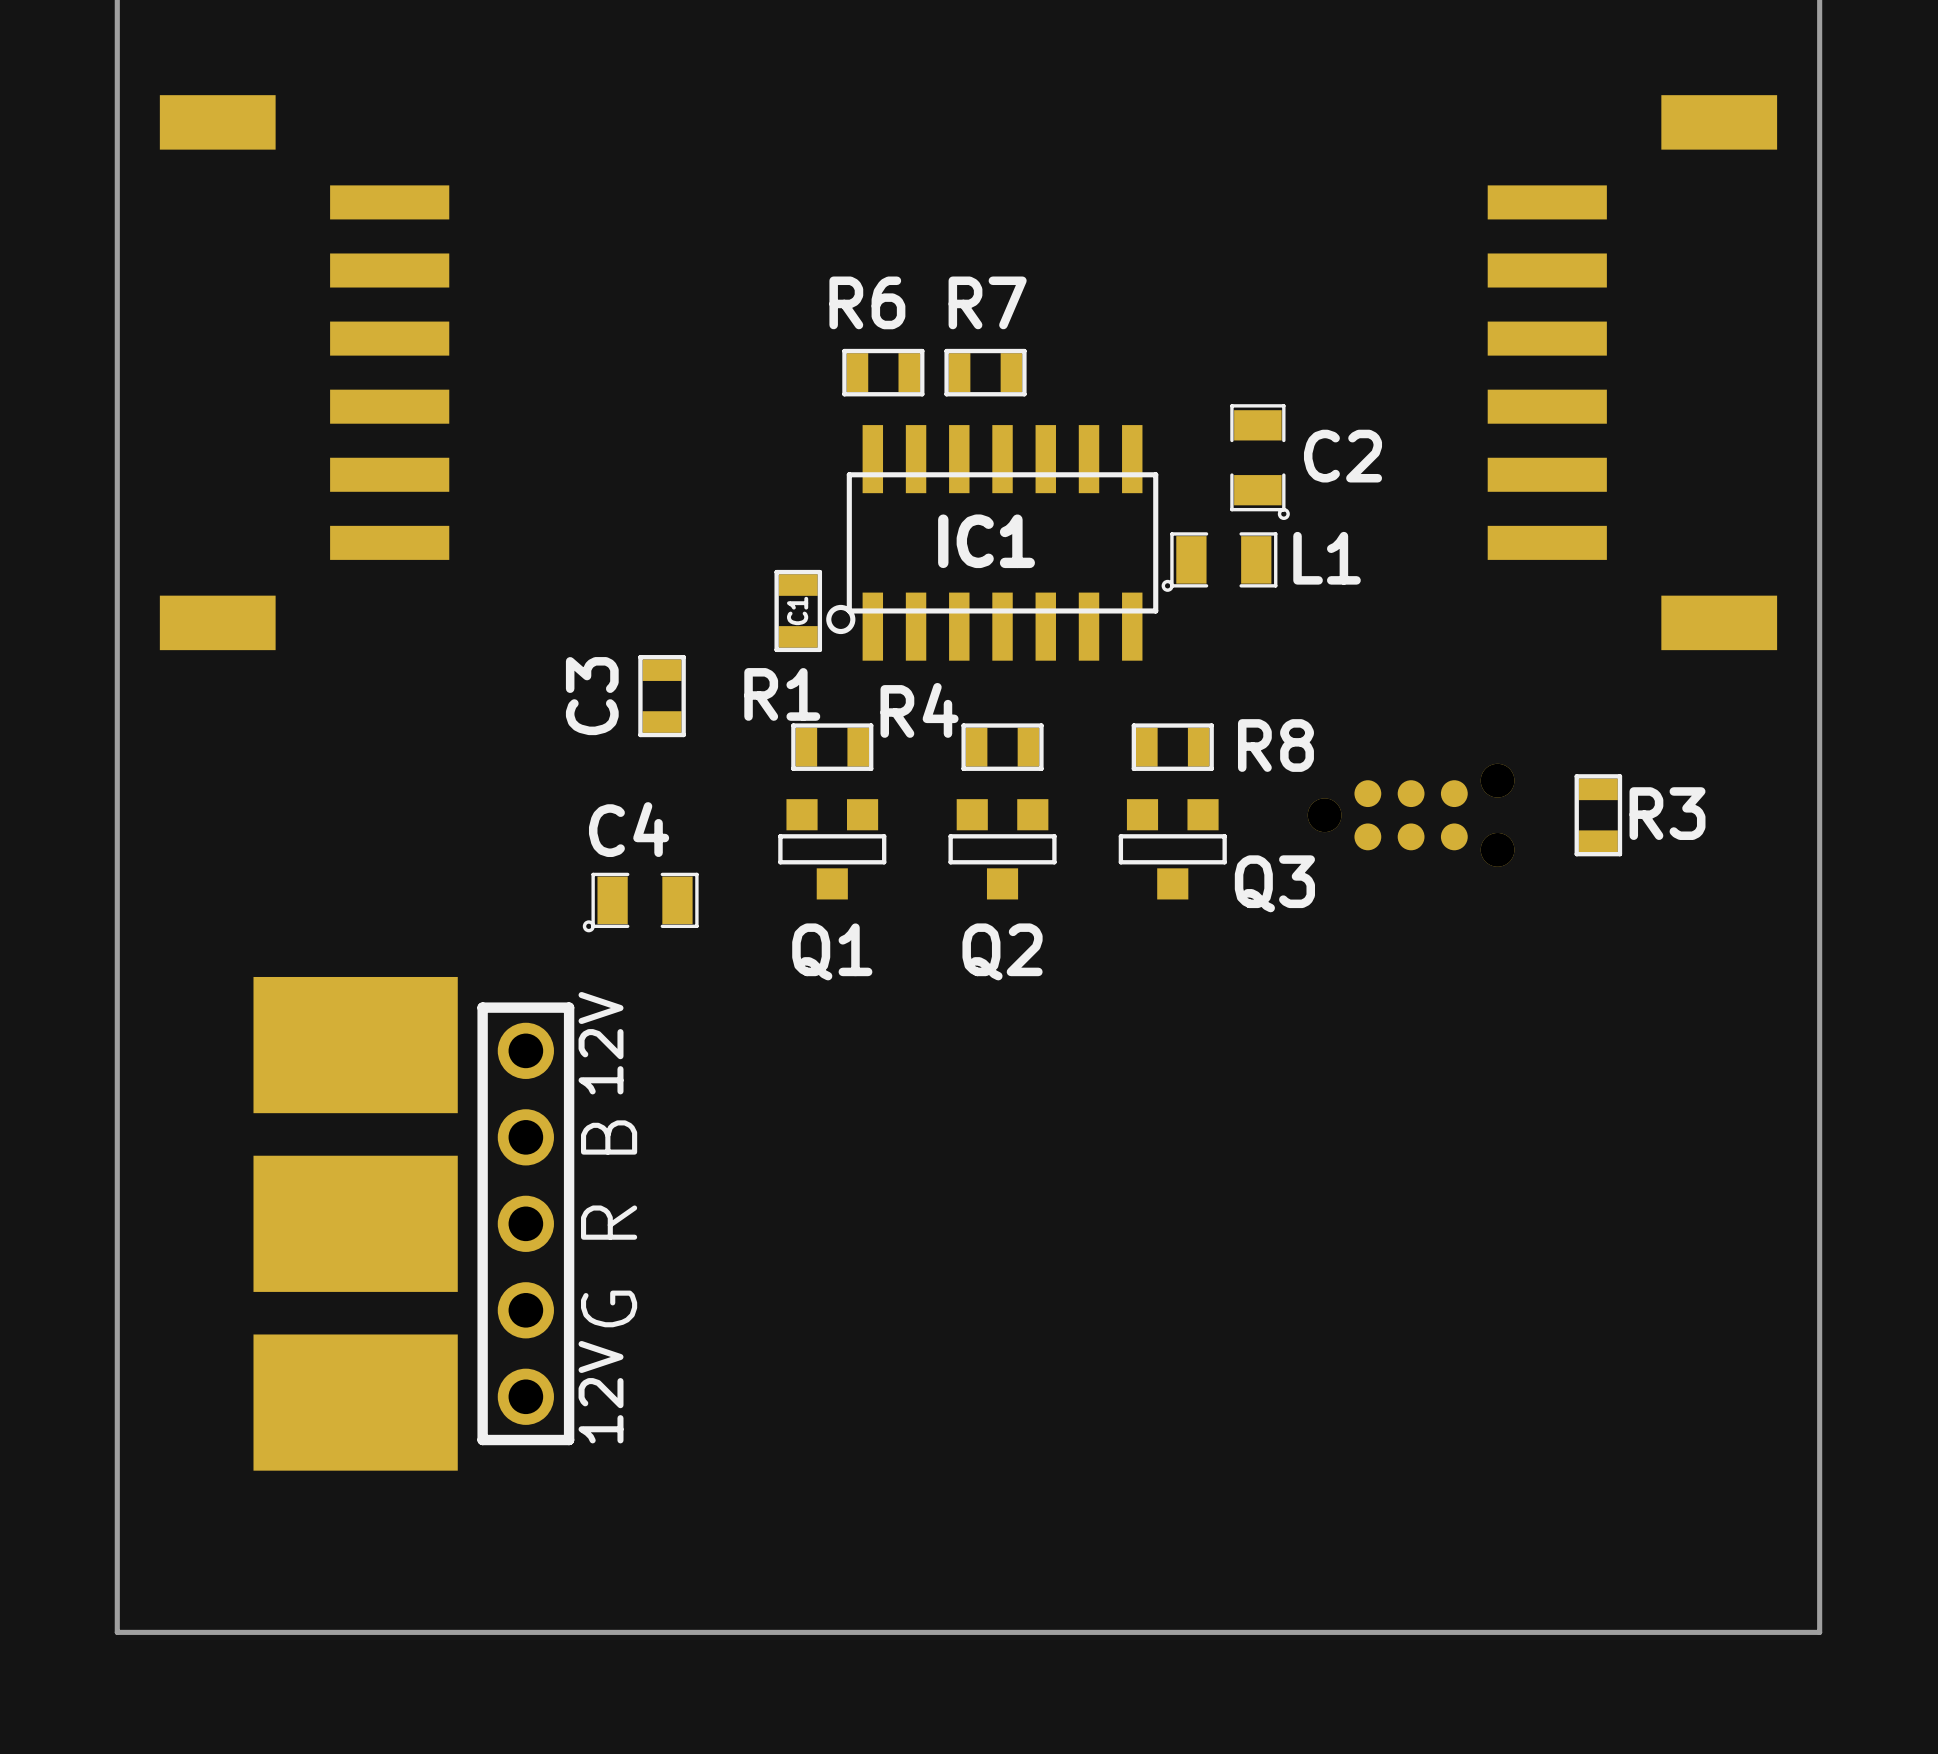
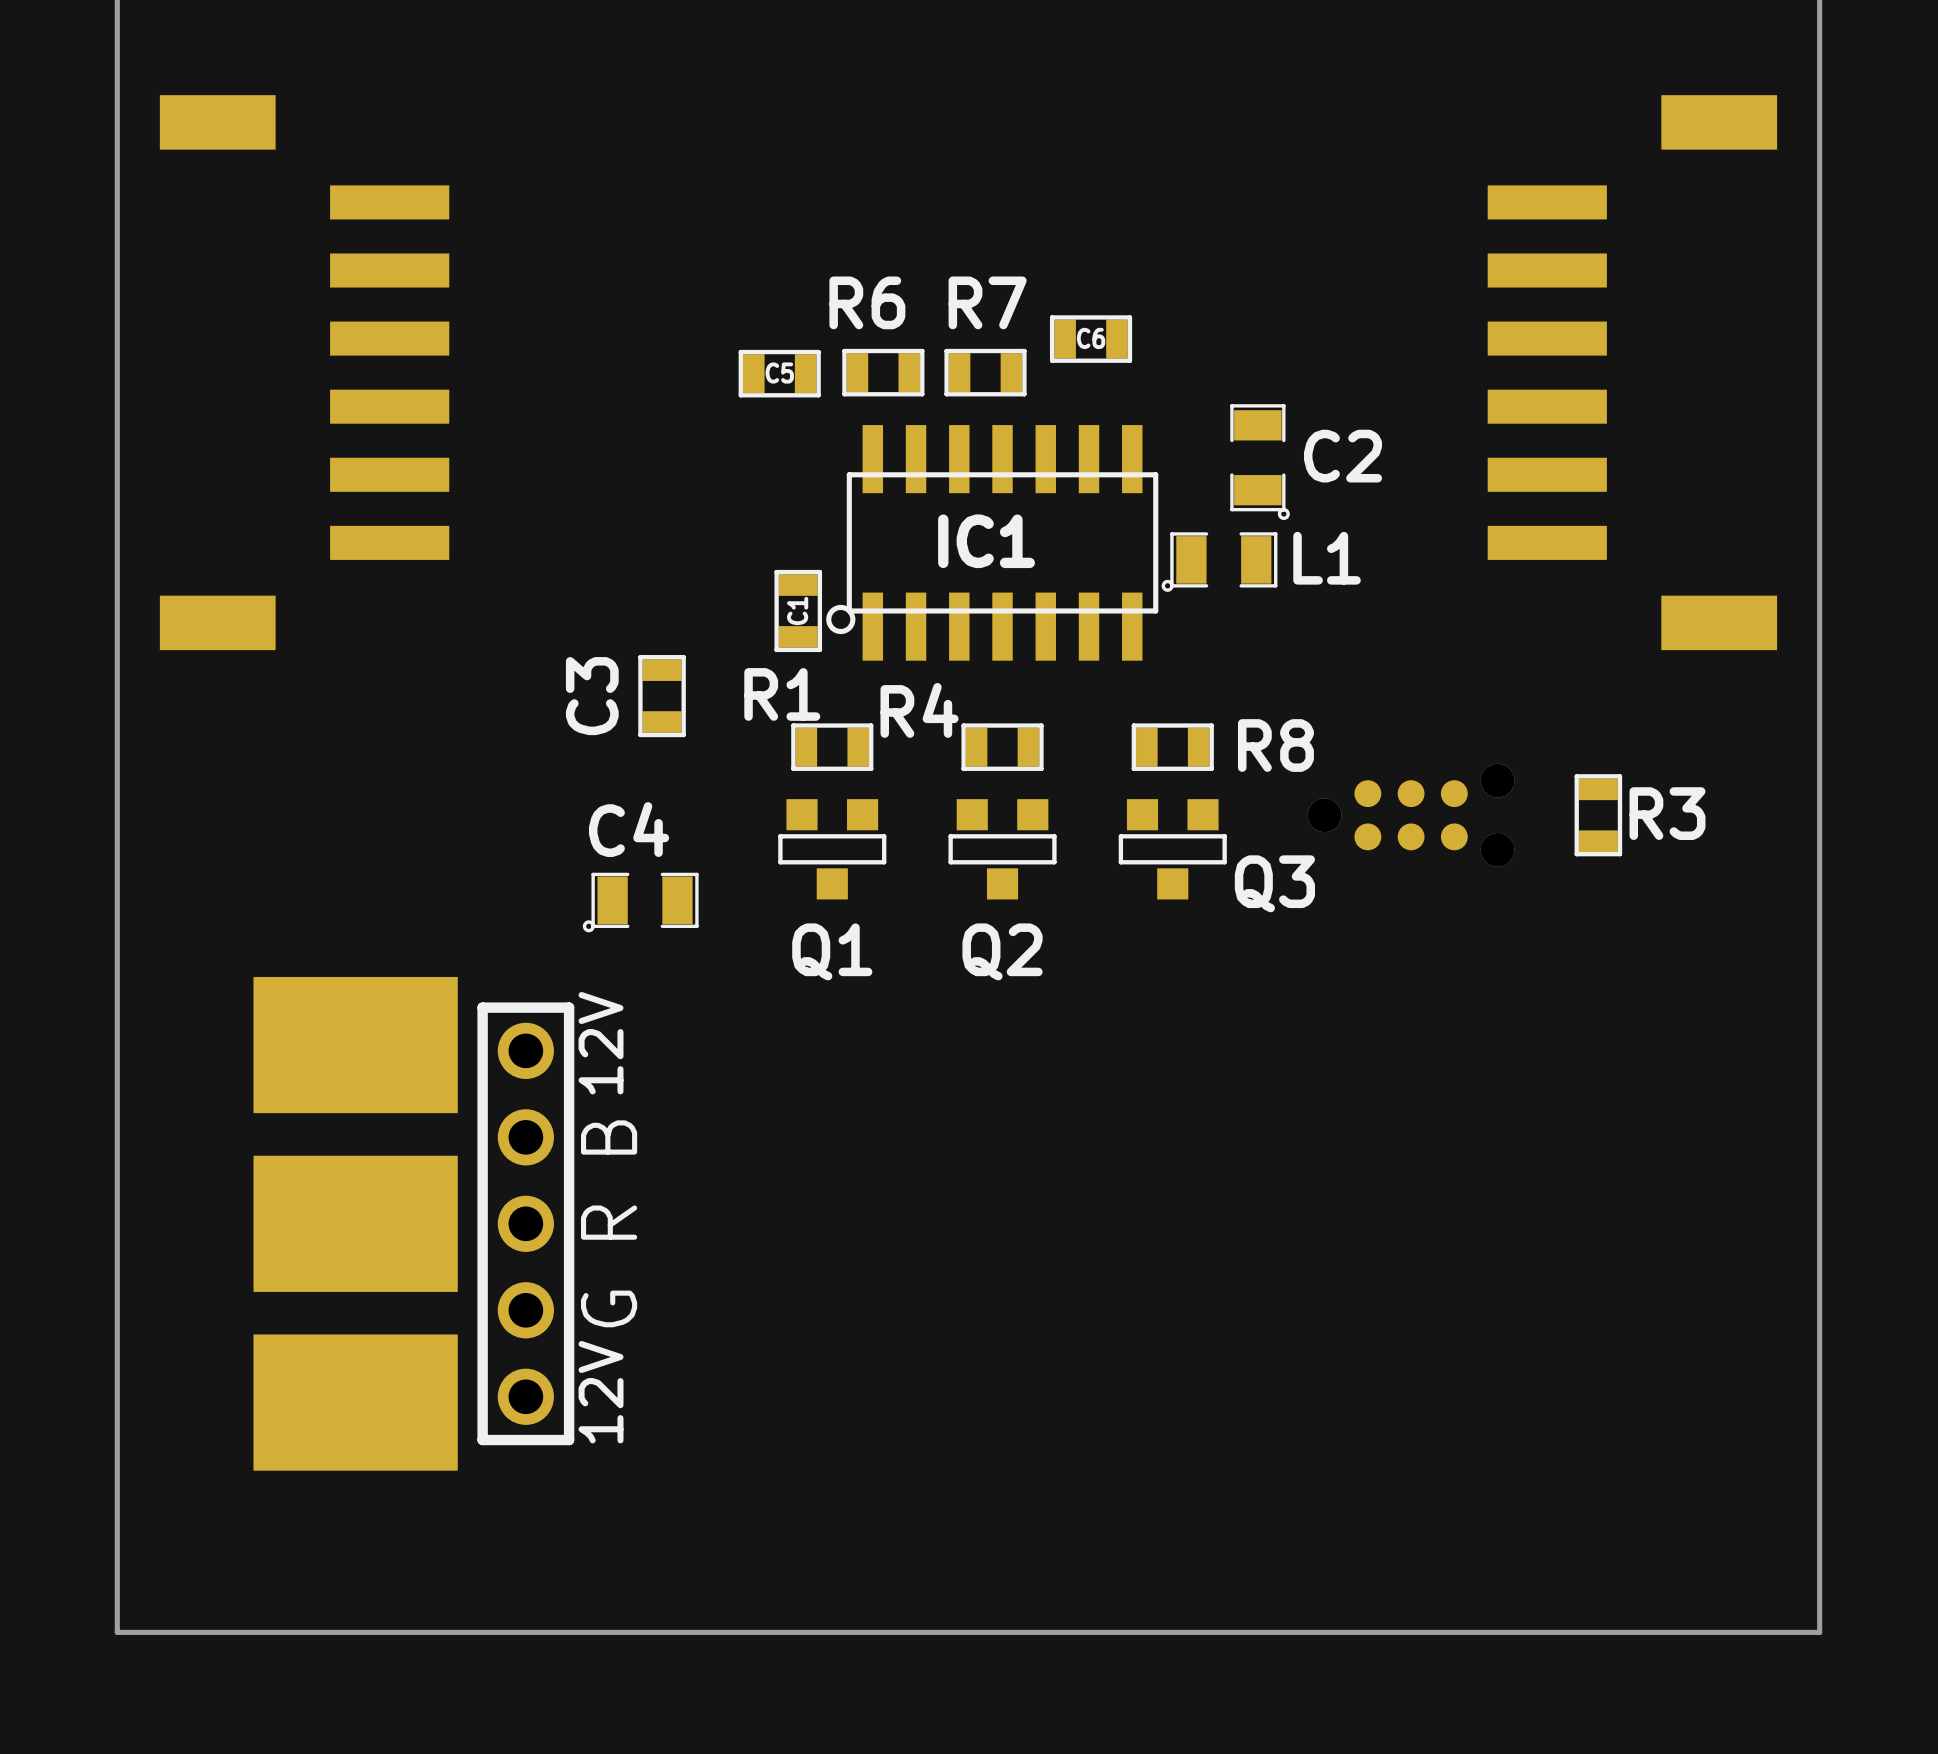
C6: none -> (1091, 339)
C5: none -> (779, 373)

